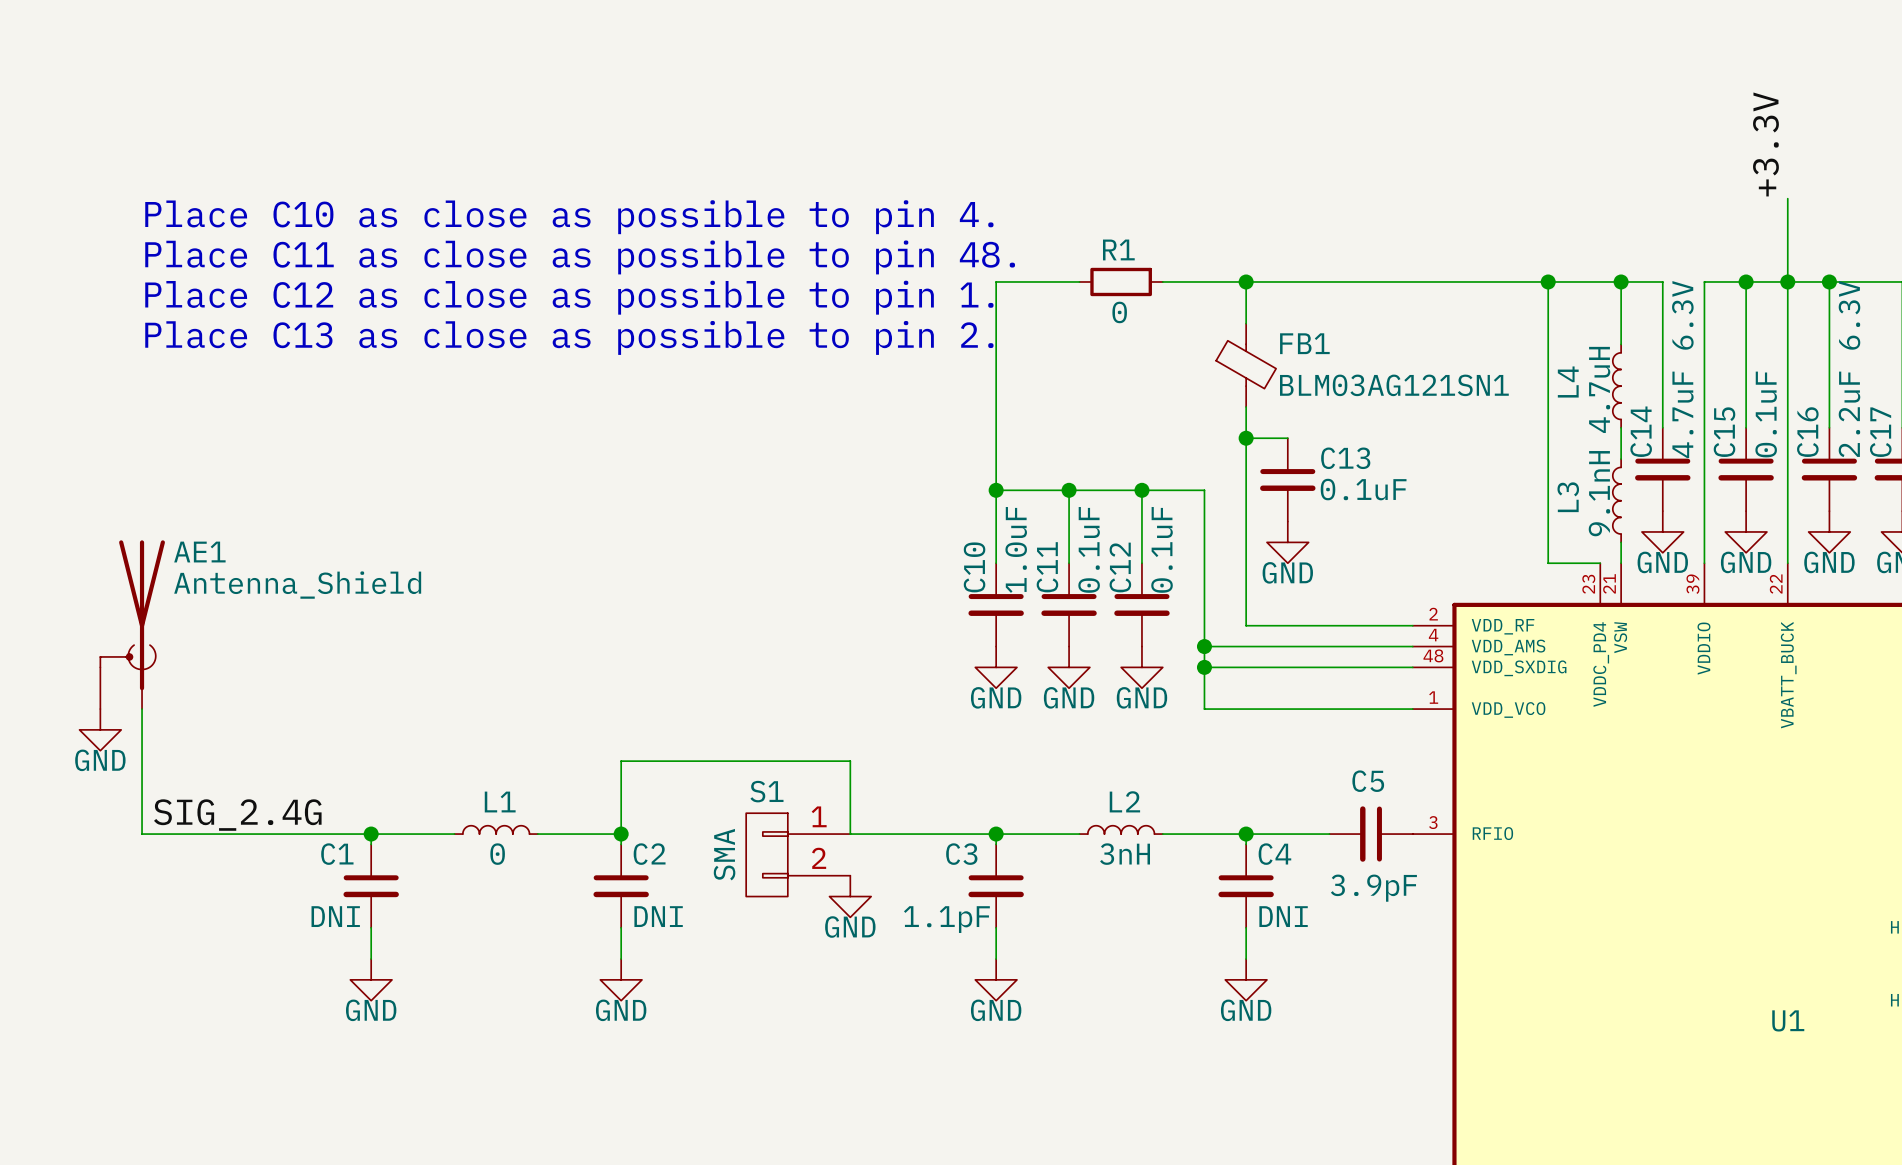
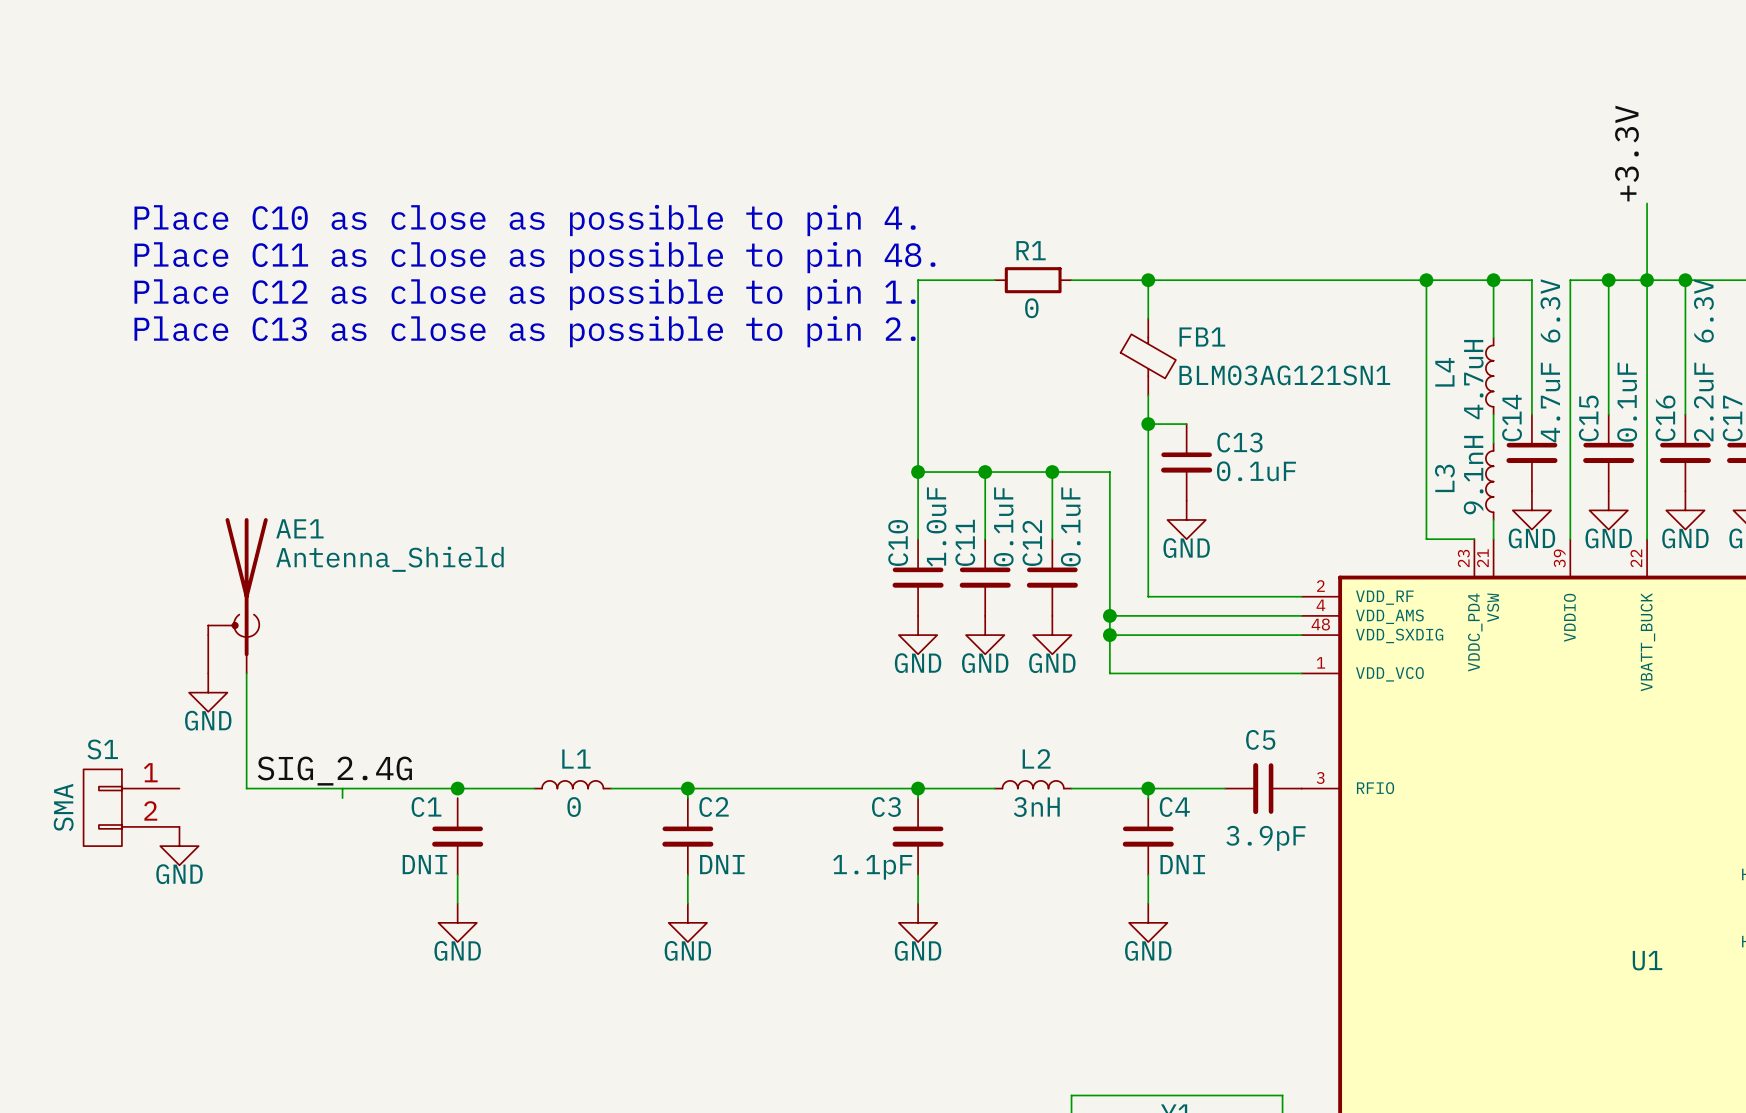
AE1 position: (132, 624) -> (237, 595)
wire: (142, 709) (142, 834) (267, 834) -> (246, 673) (246, 788)
power symbol: GND (100, 729) -> none
power symbol: none -> GND (208, 692)
label position: SIG_2.4G (237, 815) -> SIG_2.4G (334, 771)
L1 position: (496, 829) -> (572, 784)
junction: (371, 834) -> none
wire: none -> (419, 788) (496, 788)
junction: none -> (457, 788)
wire: (579, 834) (621, 834) -> none
junction: (621, 834) -> none
junction: none -> (687, 788)
wire: (850, 834) (850, 761) (621, 761) (621, 844) -> (783, 788) (611, 788)
S1 position: (798, 854) -> (131, 807)
C1 position: (371, 886) -> (457, 836)
C2 position: (621, 886) -> (687, 836)
power symbol: none -> GND (179, 846)
power symbol: GND (850, 896) -> none
wire: (371, 927) (371, 959) -> (457, 874) (457, 903)
wire: (621, 927) (621, 959) -> (687, 874) (687, 903)
power symbol: GND (371, 979) -> none
power symbol: none -> GND (457, 922)
power symbol: GND (621, 979) -> none
power symbol: none -> GND (687, 922)

